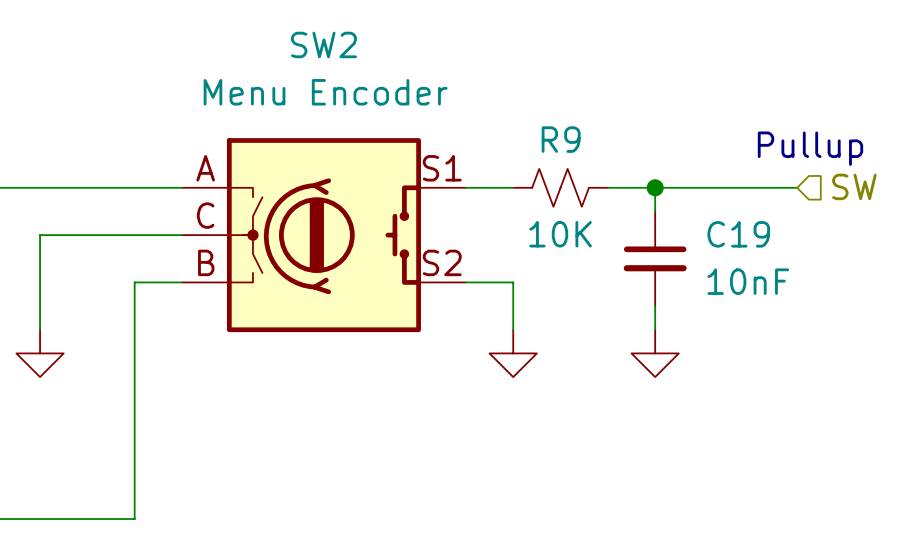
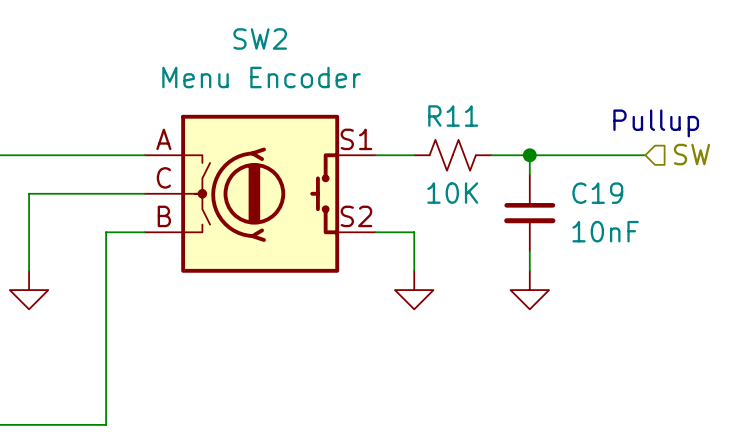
R9 name: R9 (561, 139) -> R11 (453, 116)

